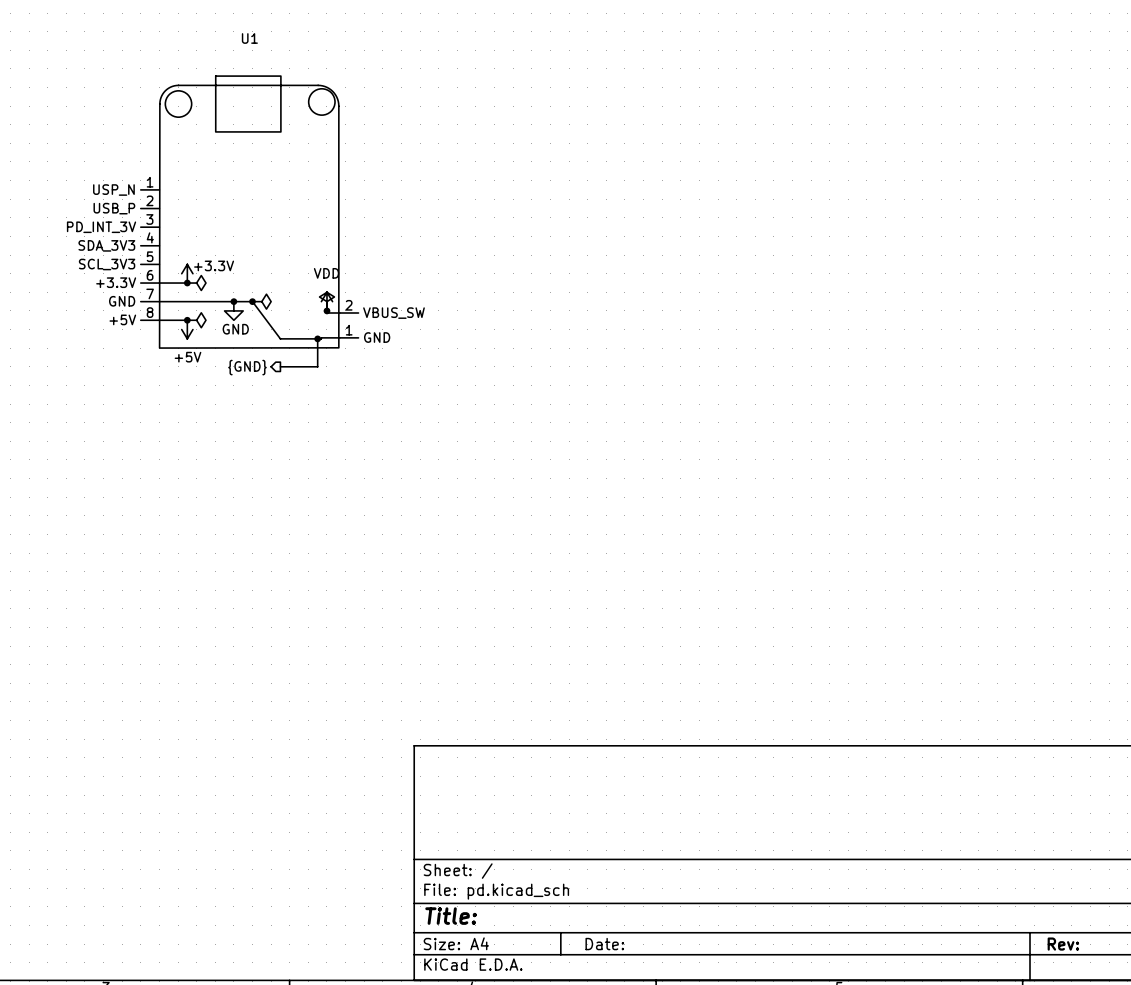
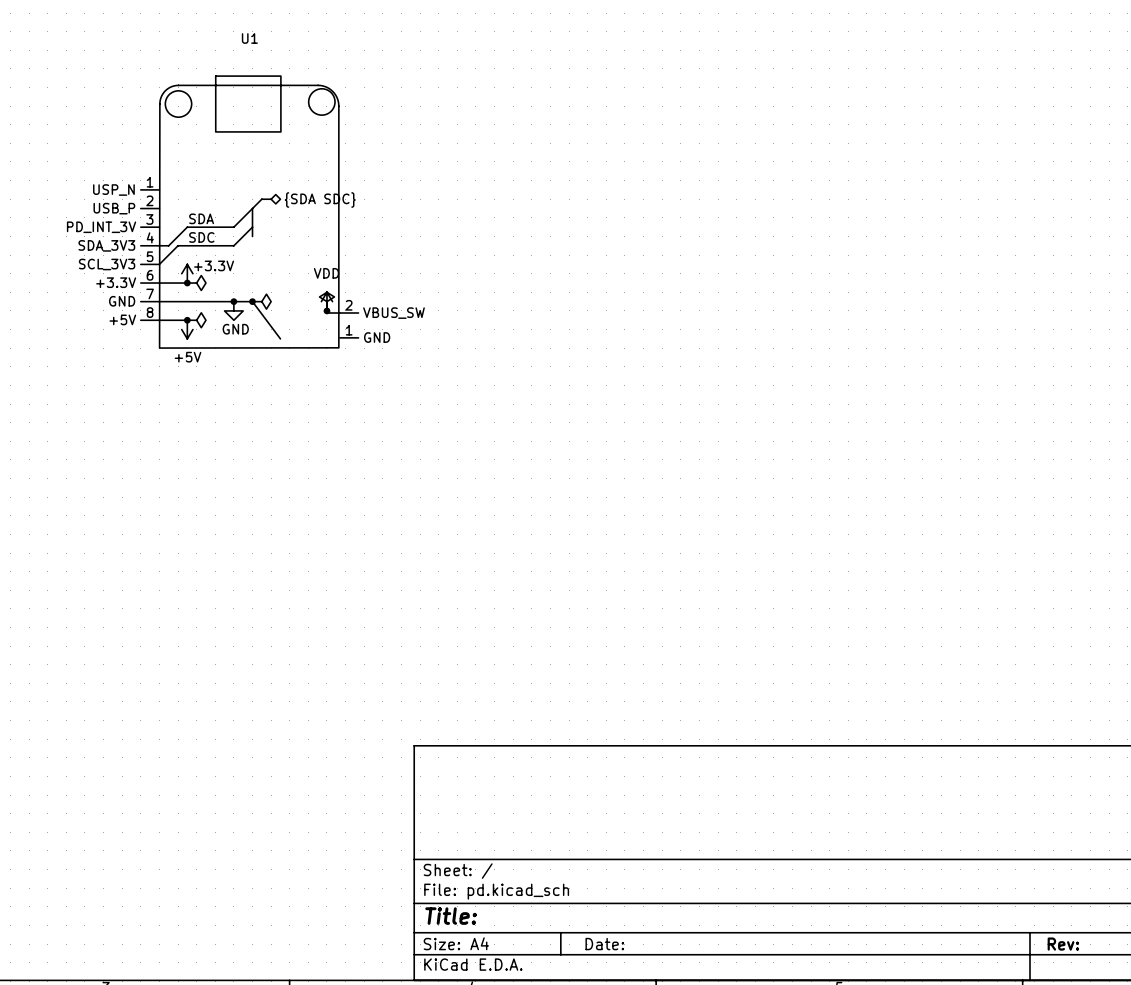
bus: none -> (271, 199) (261, 199) (252, 208) (252, 236)
hierarchical label: none -> {SDA SDC} (320, 199)
wire: none -> (252, 208) (233, 227) (187, 227) (168, 245) (159, 245)
label: none -> SDA (201, 218)
wire: none -> (252, 227) (233, 245) (178, 245) (159, 264)
label: none -> SDC (201, 237)
wire: (339, 337) (280, 338) -> none
wire: (317, 338) (317, 366) (280, 366) -> none
junction: (317, 338) -> none
hierarchical label: {GND} (247, 367) -> none

